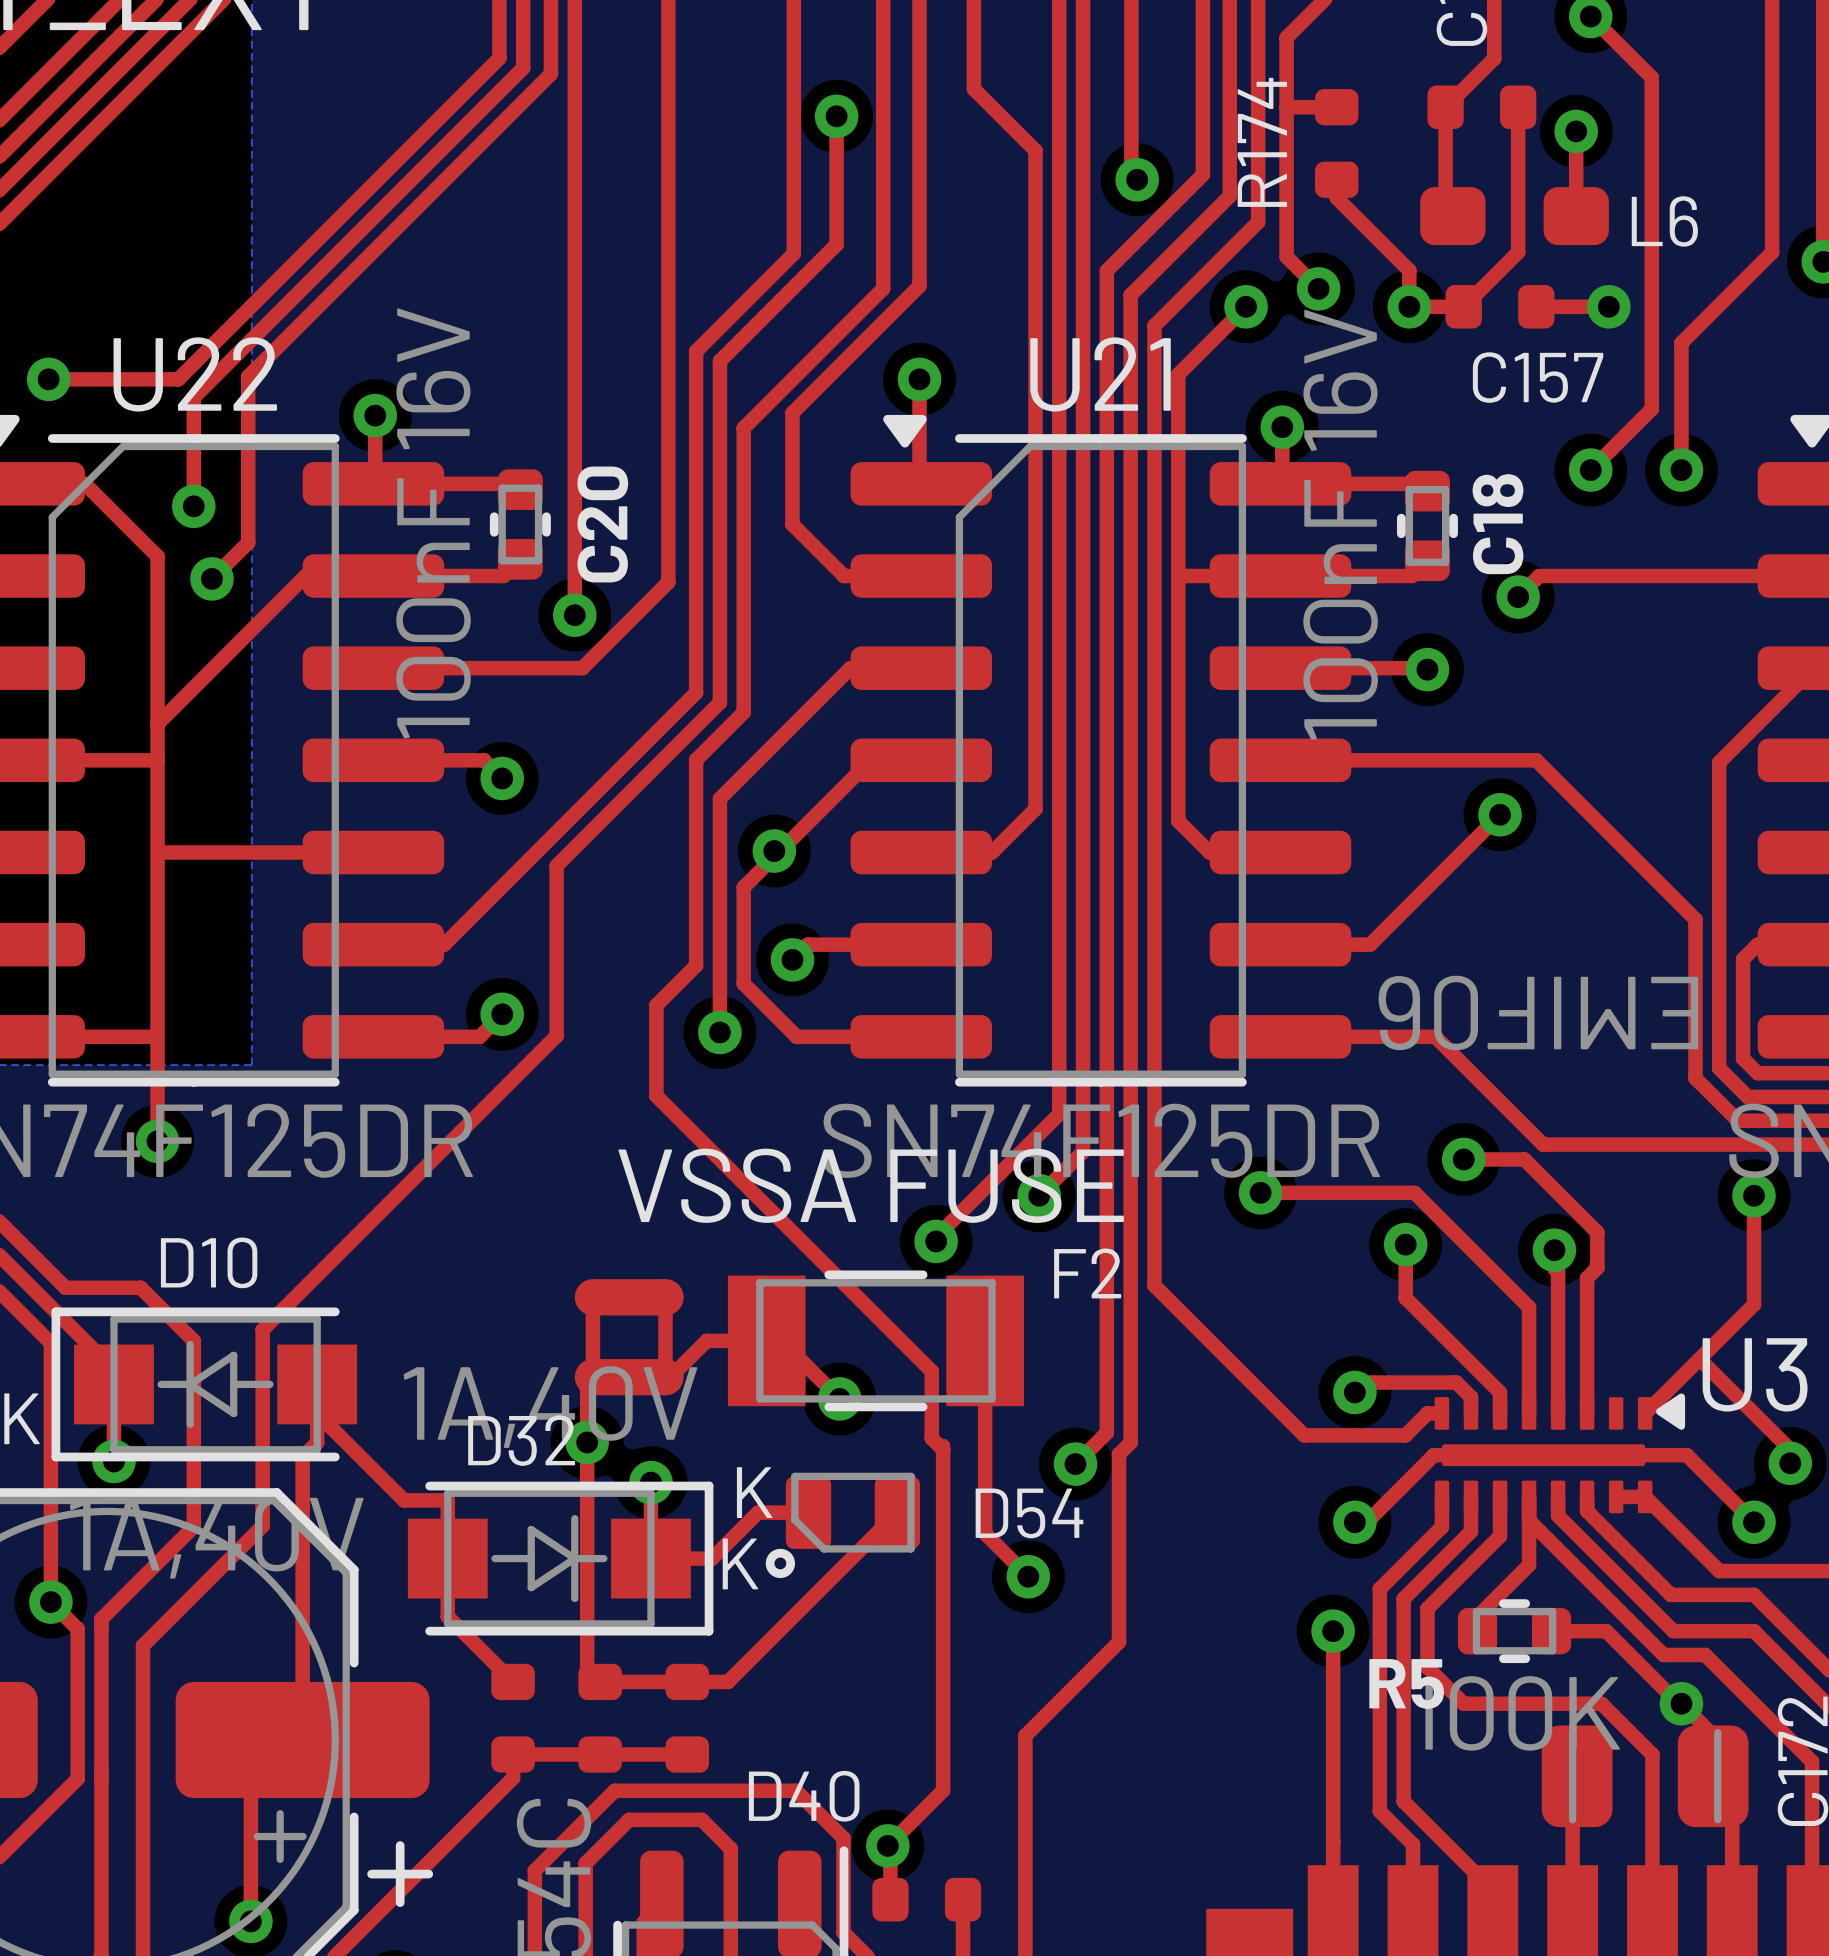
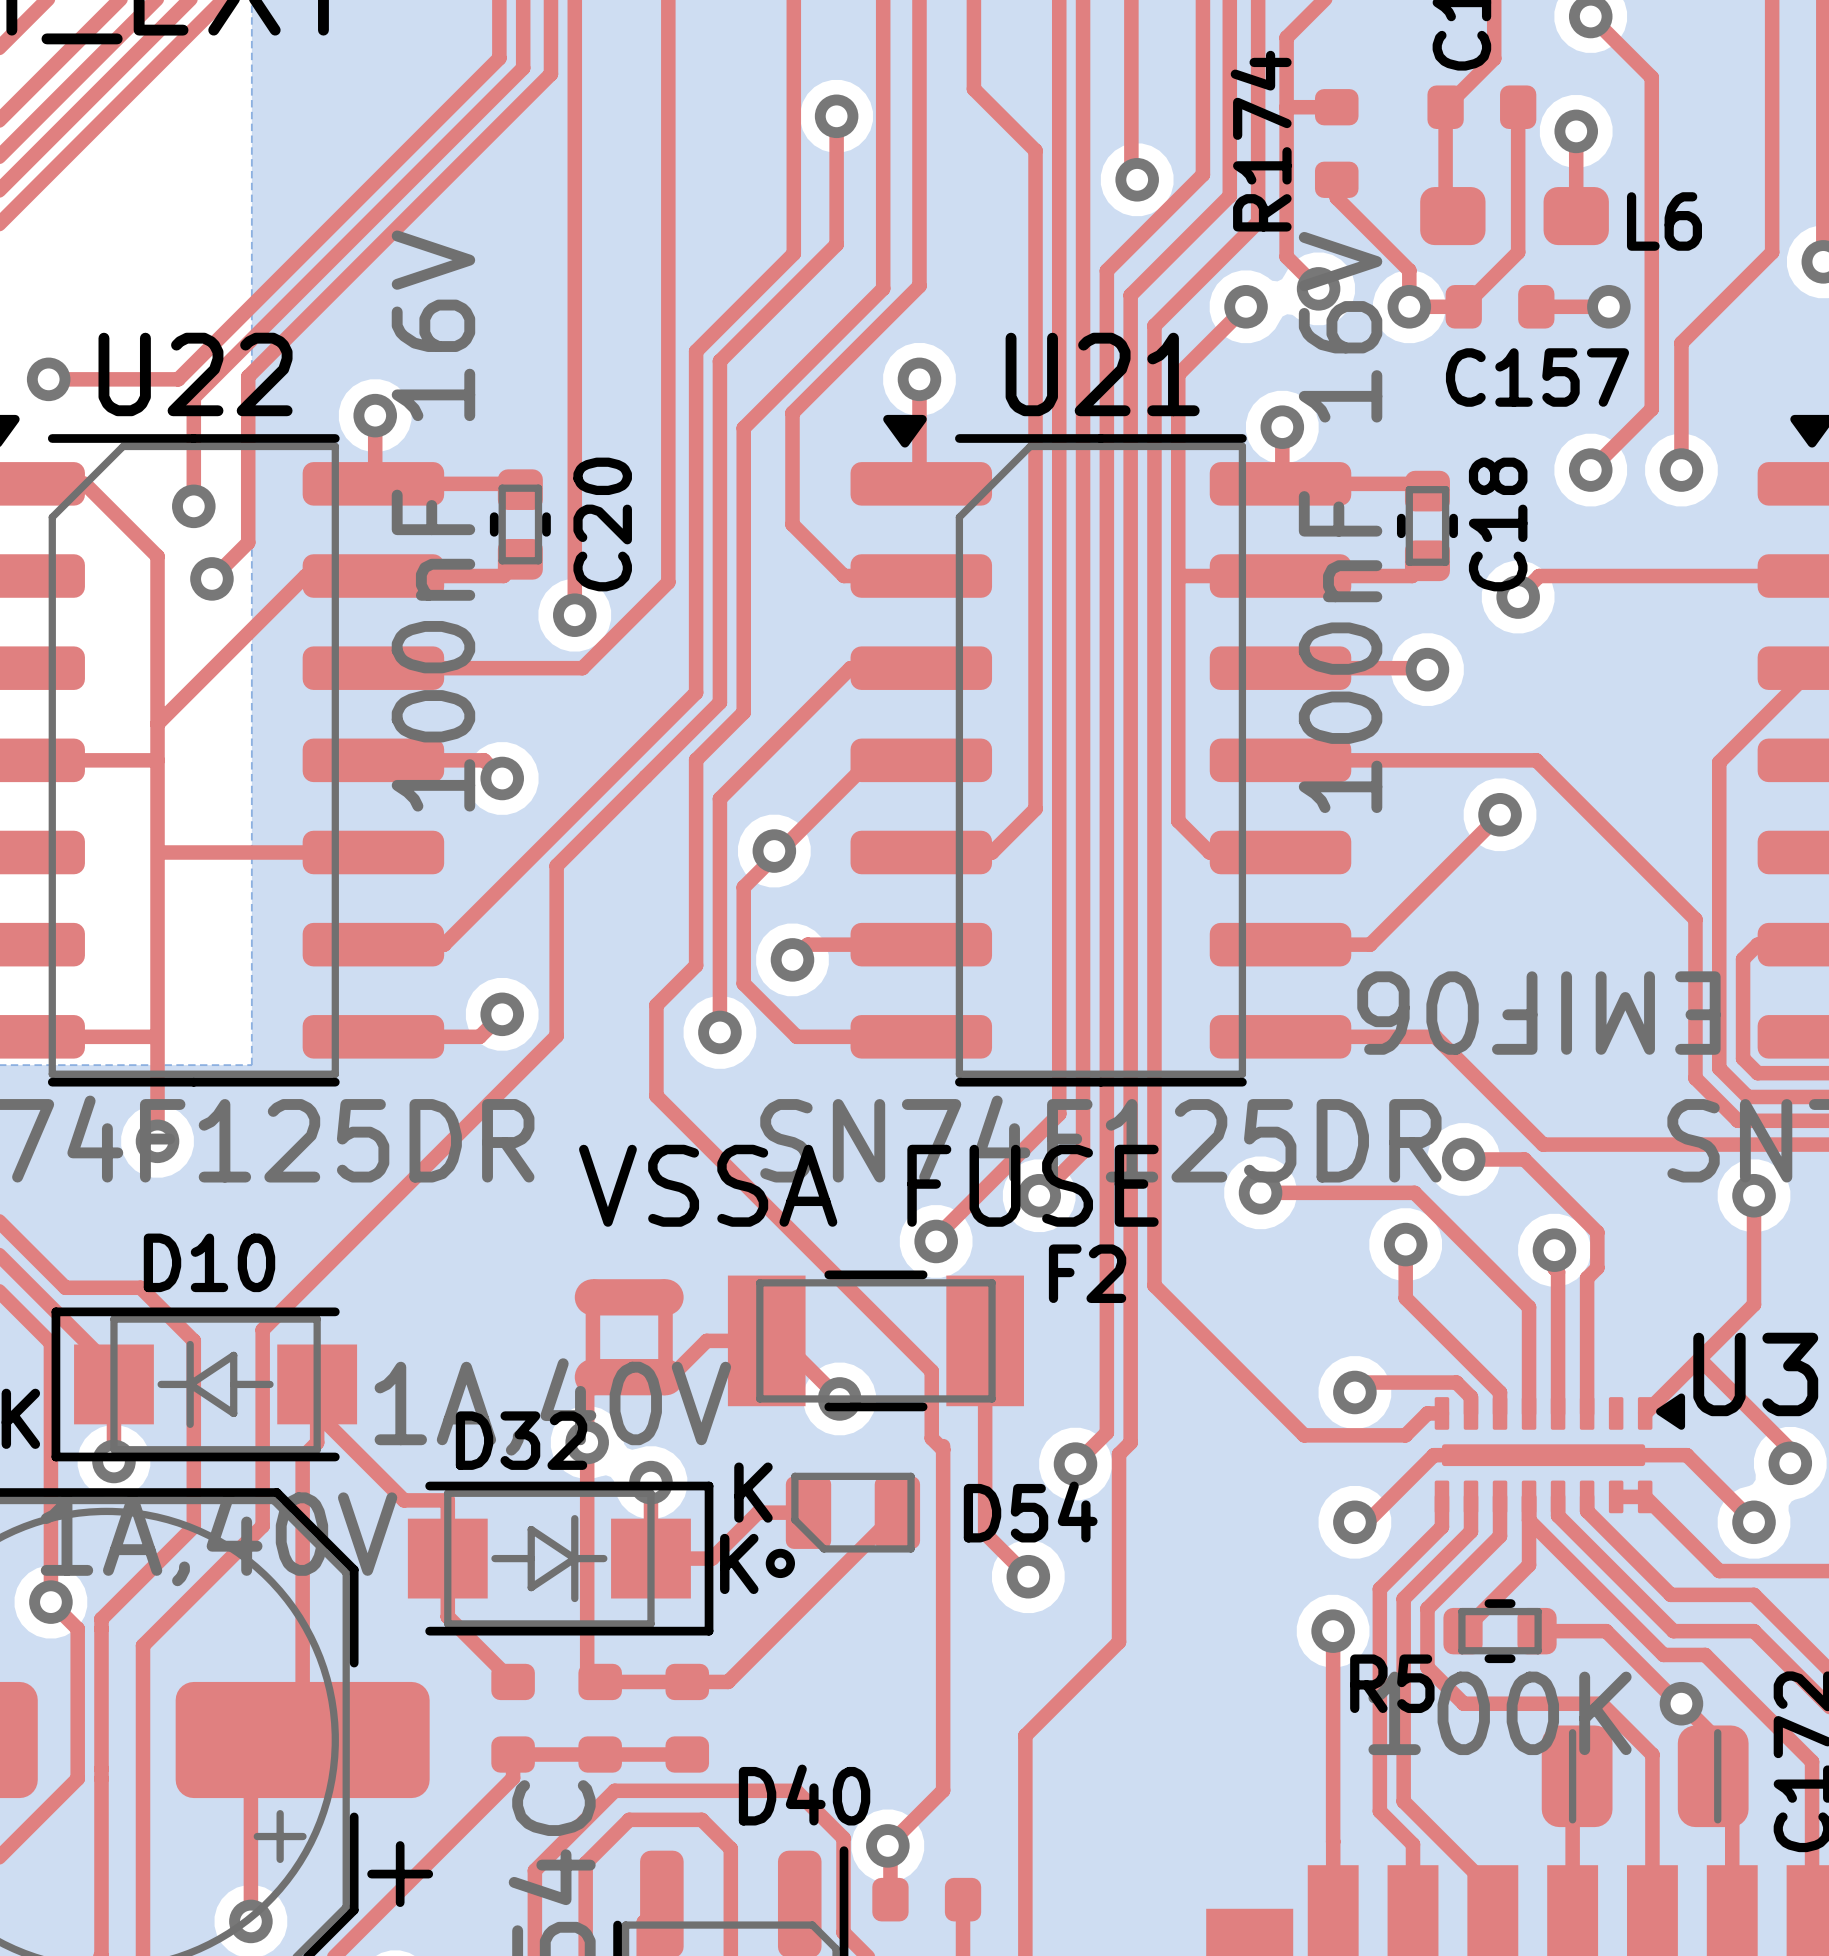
R5 position: (1514, 1631) -> (1500, 1631)

